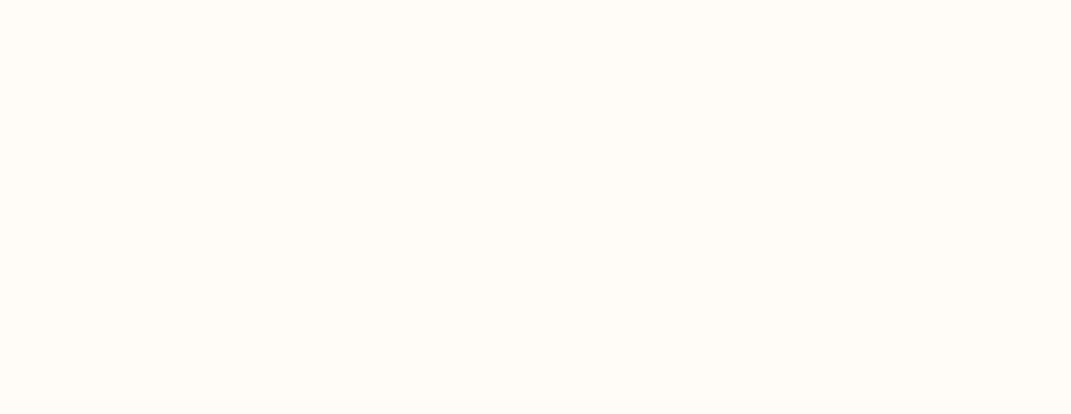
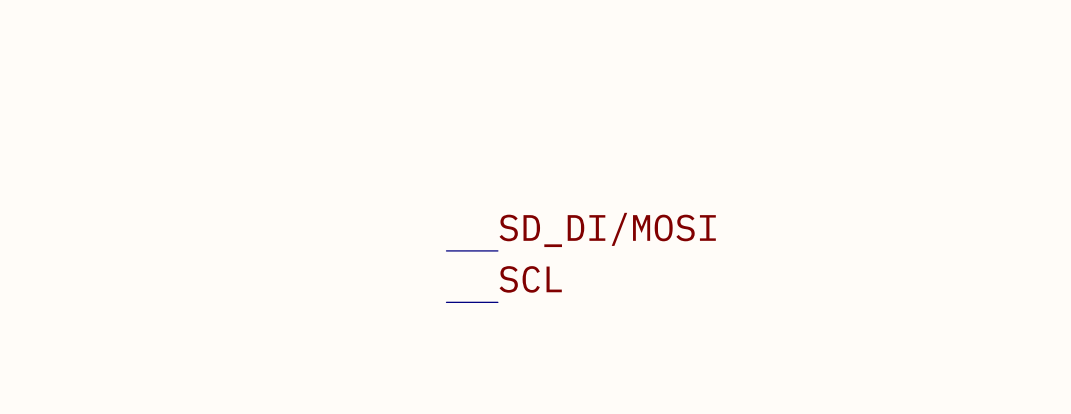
label: none -> SD_DI/MOSI (607, 229)
wire: none -> (446, 250) (497, 250)
label: none -> SCL (530, 279)
wire: none -> (446, 302) (497, 302)

